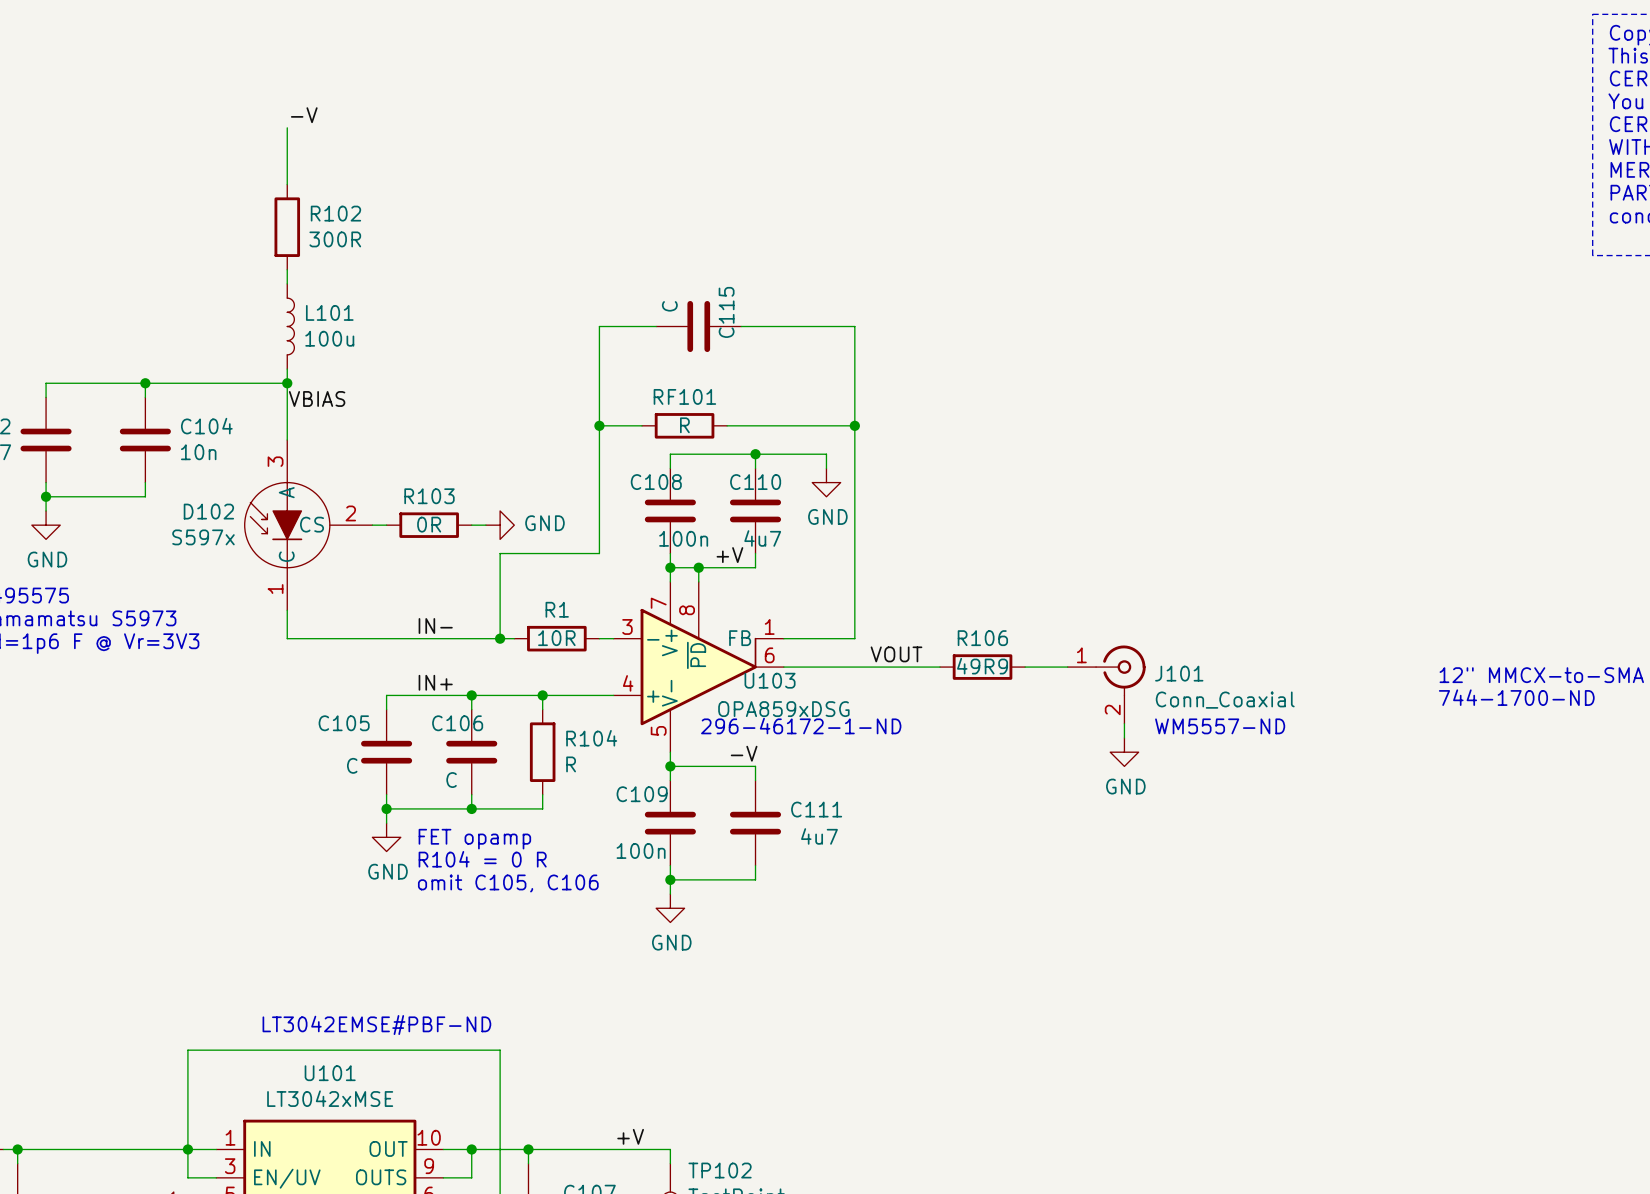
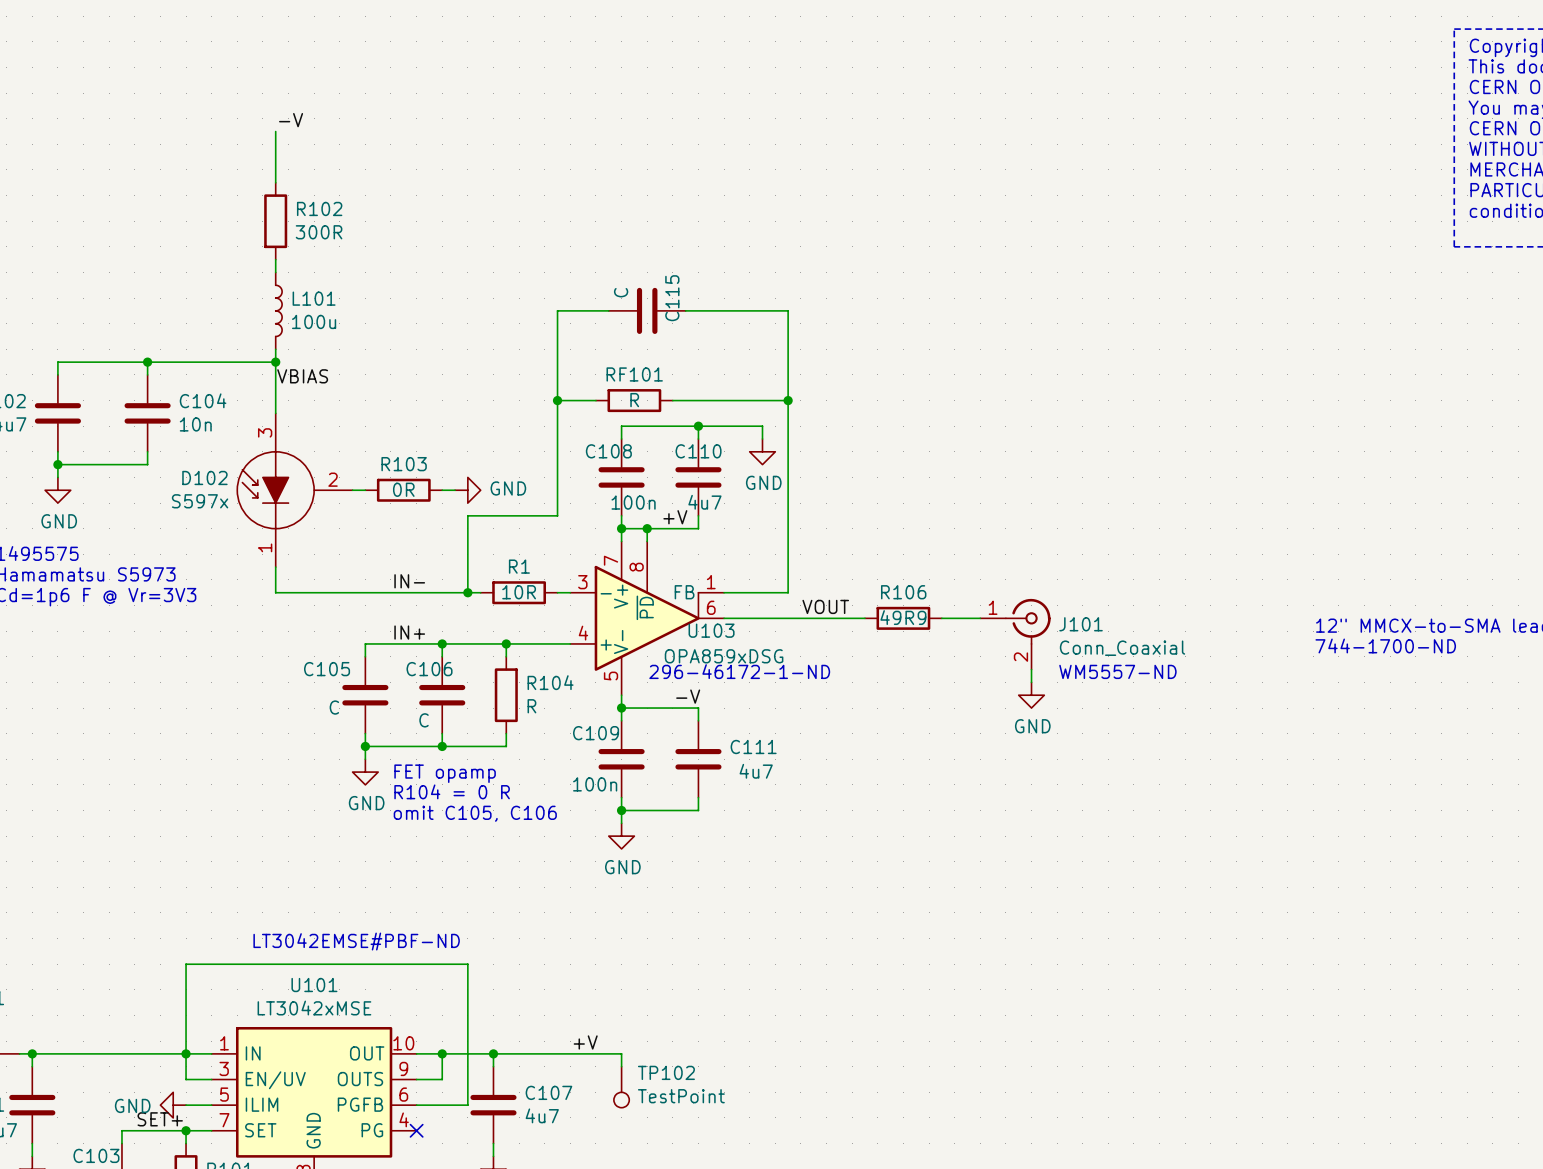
D102 pin name: A (286, 492) -> none
D102 pin name: CS (312, 524) -> none
D102 pin name: C (286, 556) -> none

